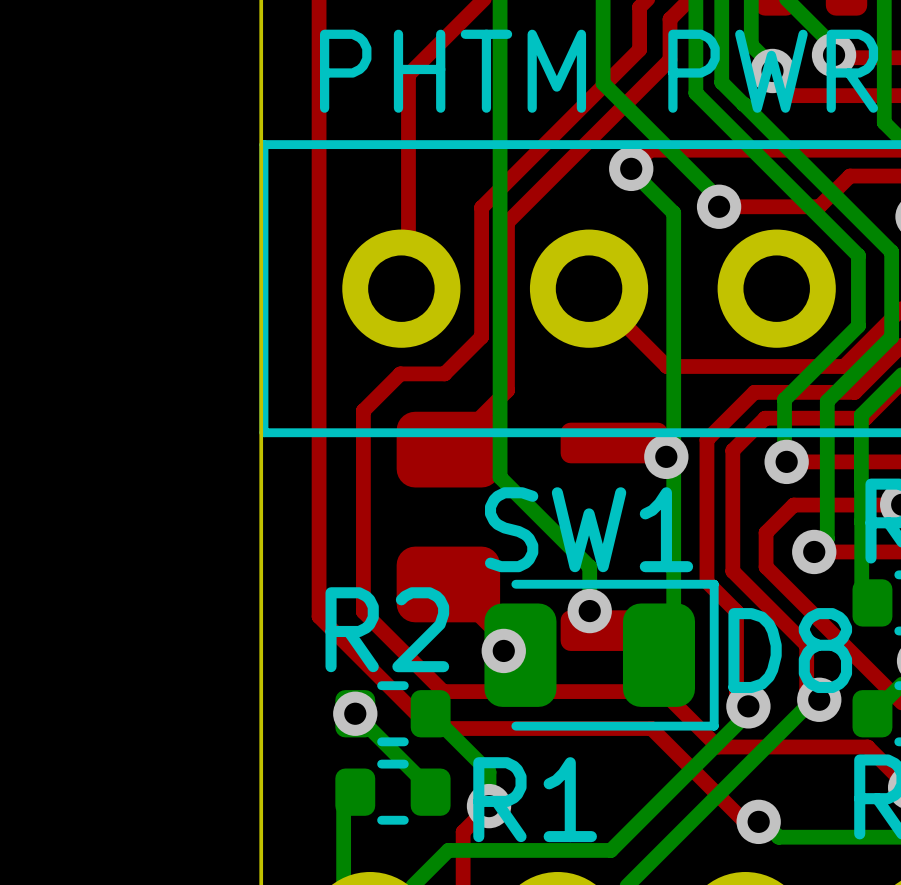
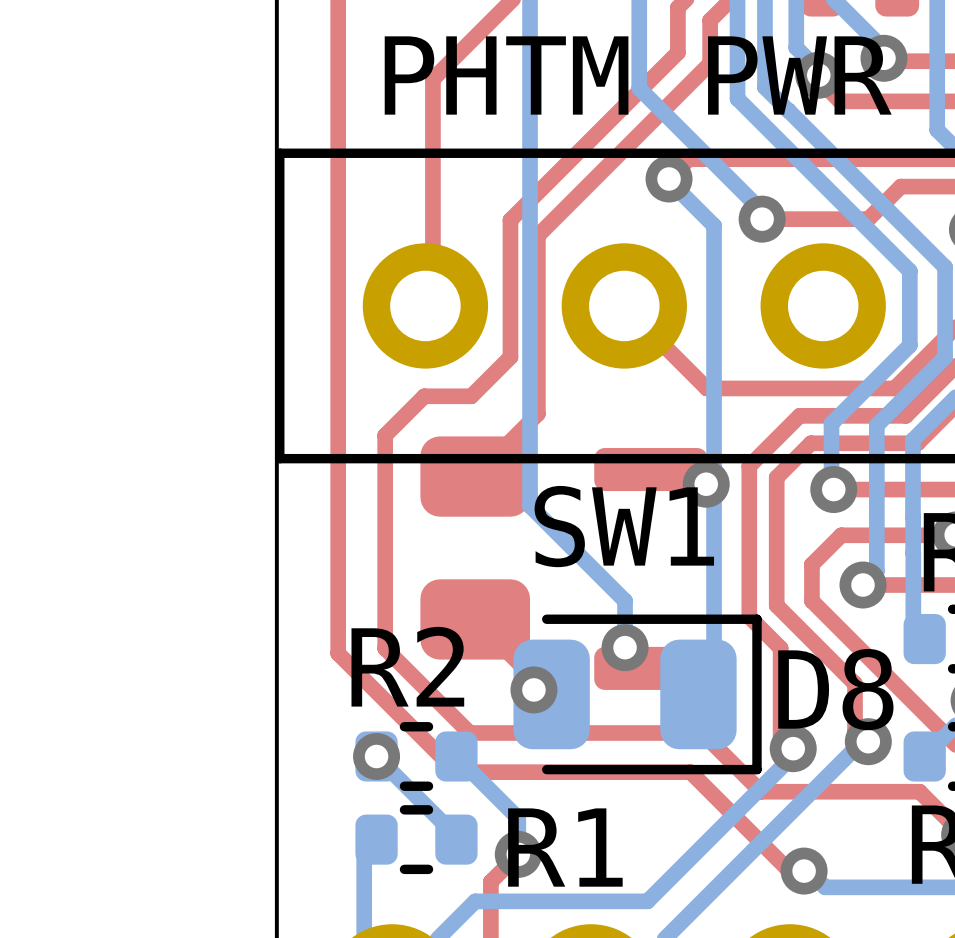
SW1 name position: SW1 (589, 529) -> SW1 (624, 526)

